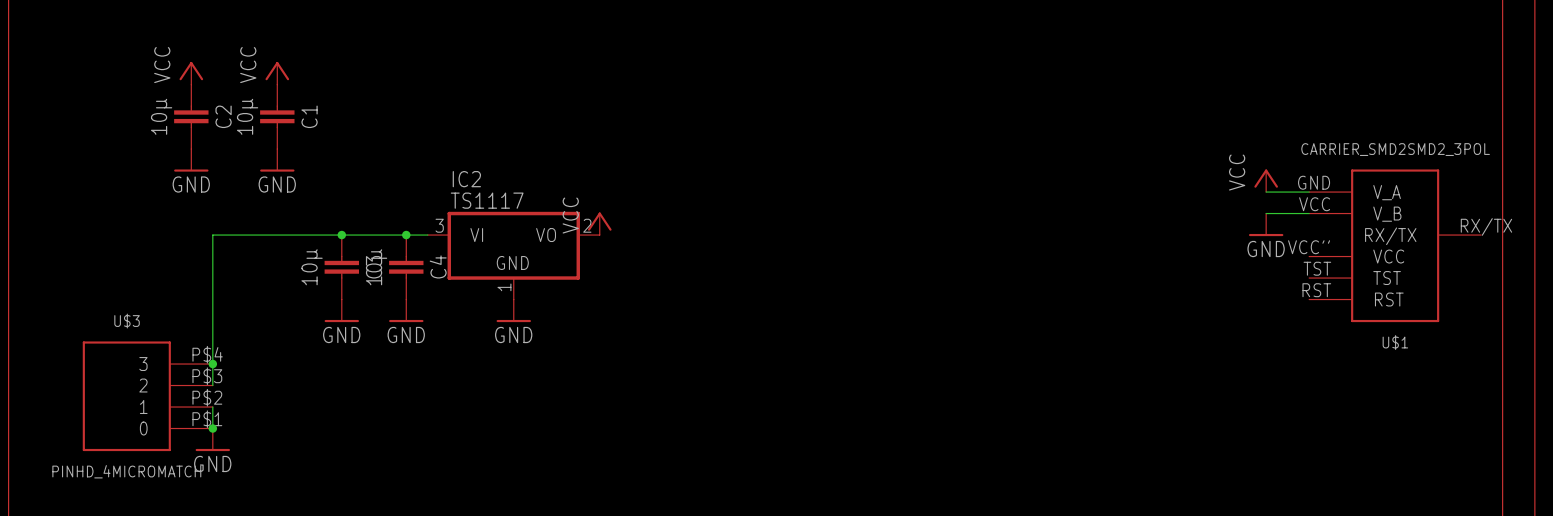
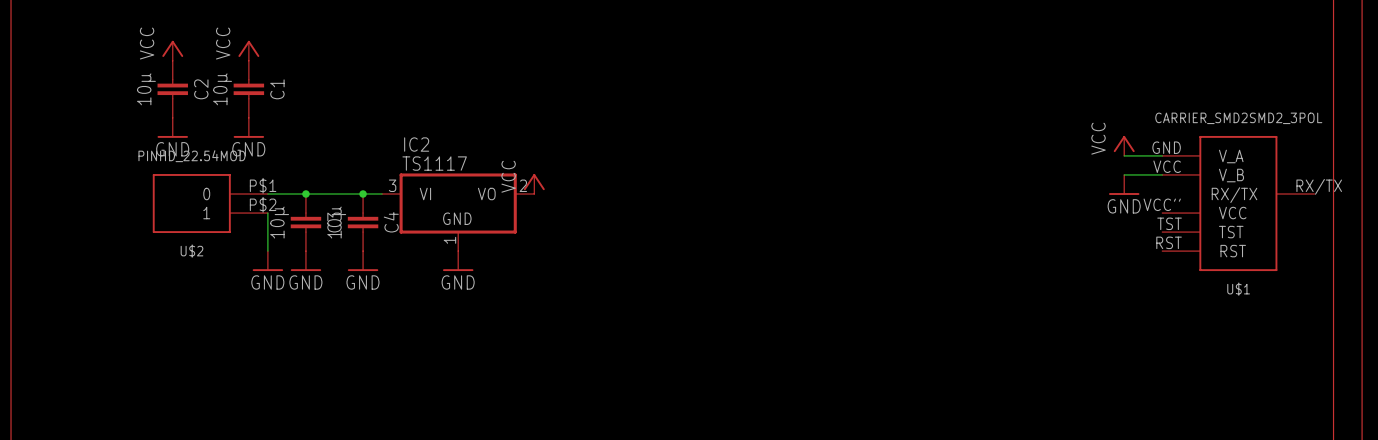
wire: (298, 235) (212, 235) (212, 385) -> none
U$2: none -> PINHD_22.54MOD (210, 203)
wire: none -> (267, 213) (267, 251)
junction: (212, 364) -> none
U$3: PINHD_4MICROMATCH (147, 396) -> none
wire: (212, 407) (212, 428) -> none
junction: (212, 428) -> none
power symbol position: GND (212, 439) -> GND (267, 261)

